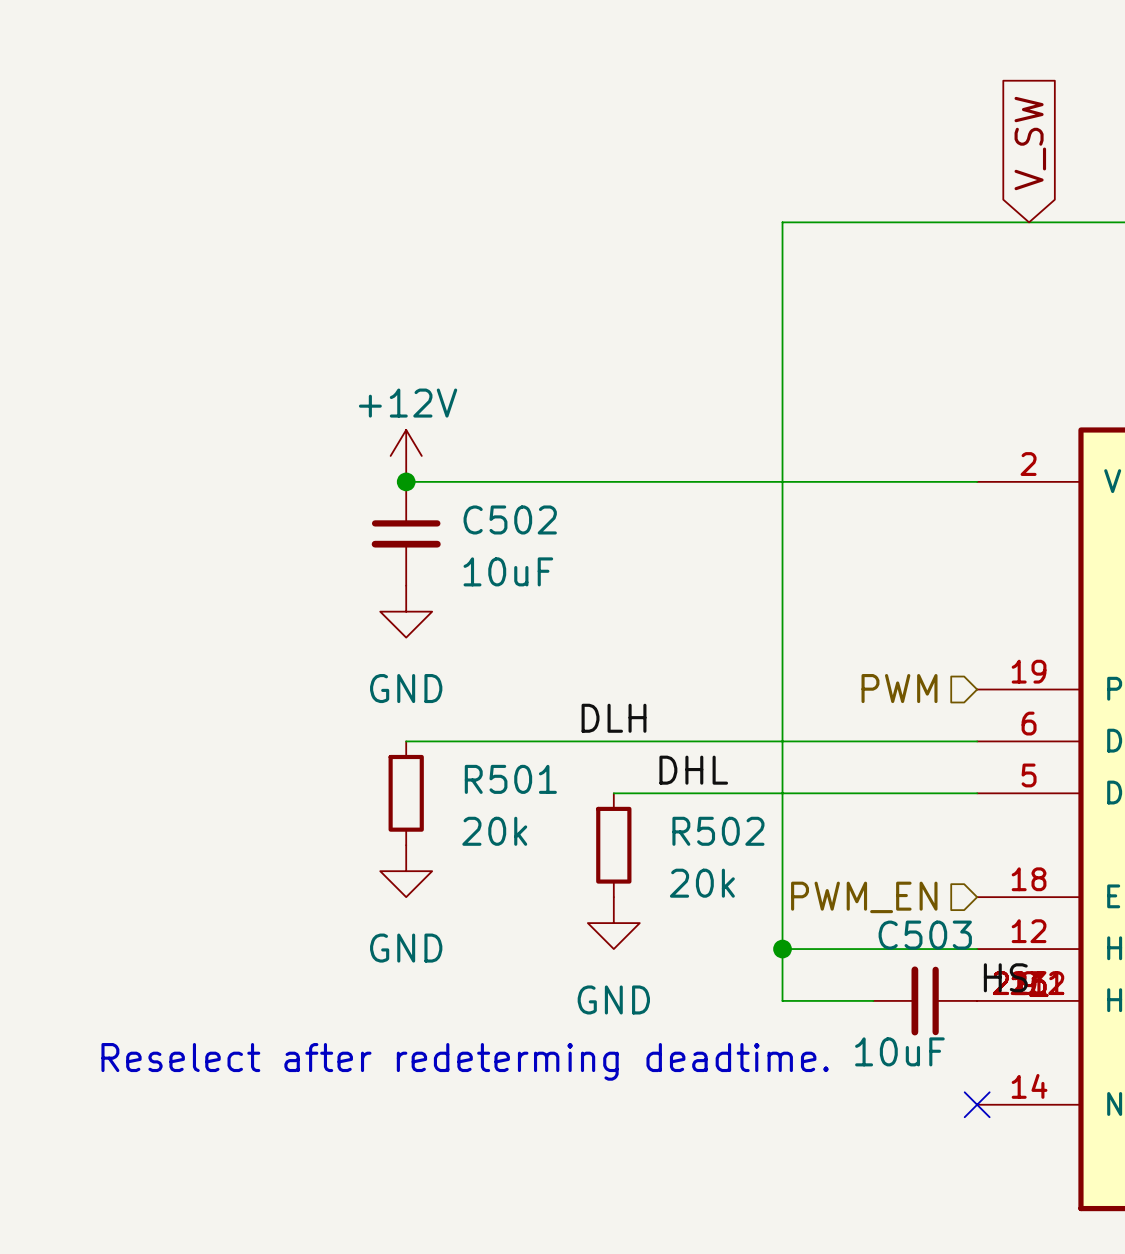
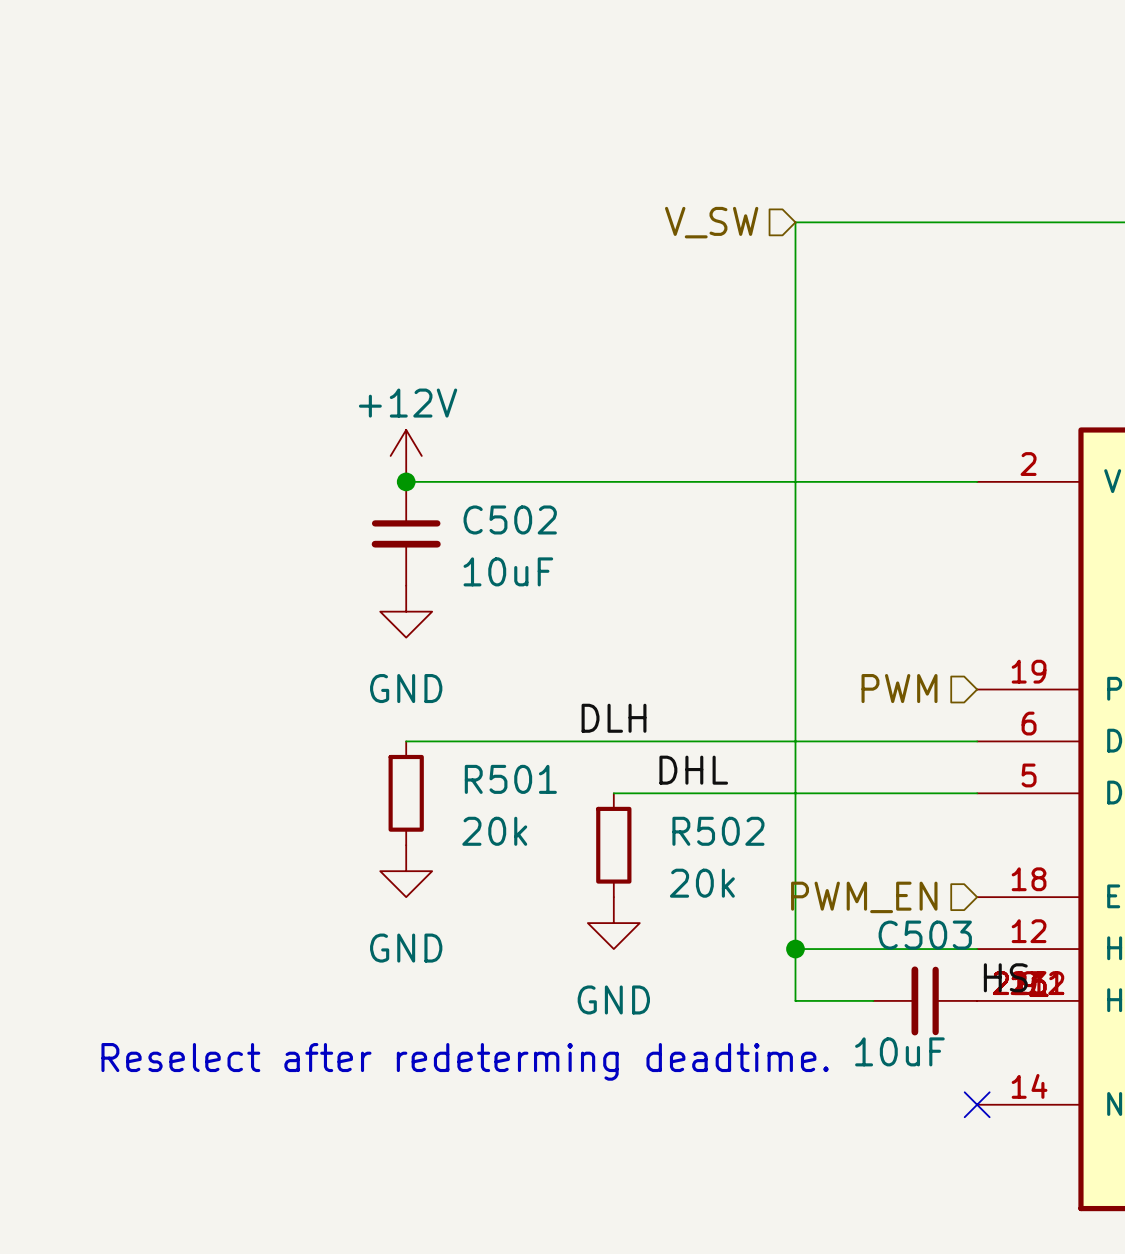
global label: V_SW (1030, 143) -> none
hierarchical label: none -> V_SW (711, 222)
wire: (795, 222) (782, 222) (782, 1000) (795, 1000) -> (795, 222) (795, 1000)
junction position: (782, 949) -> (795, 949)

